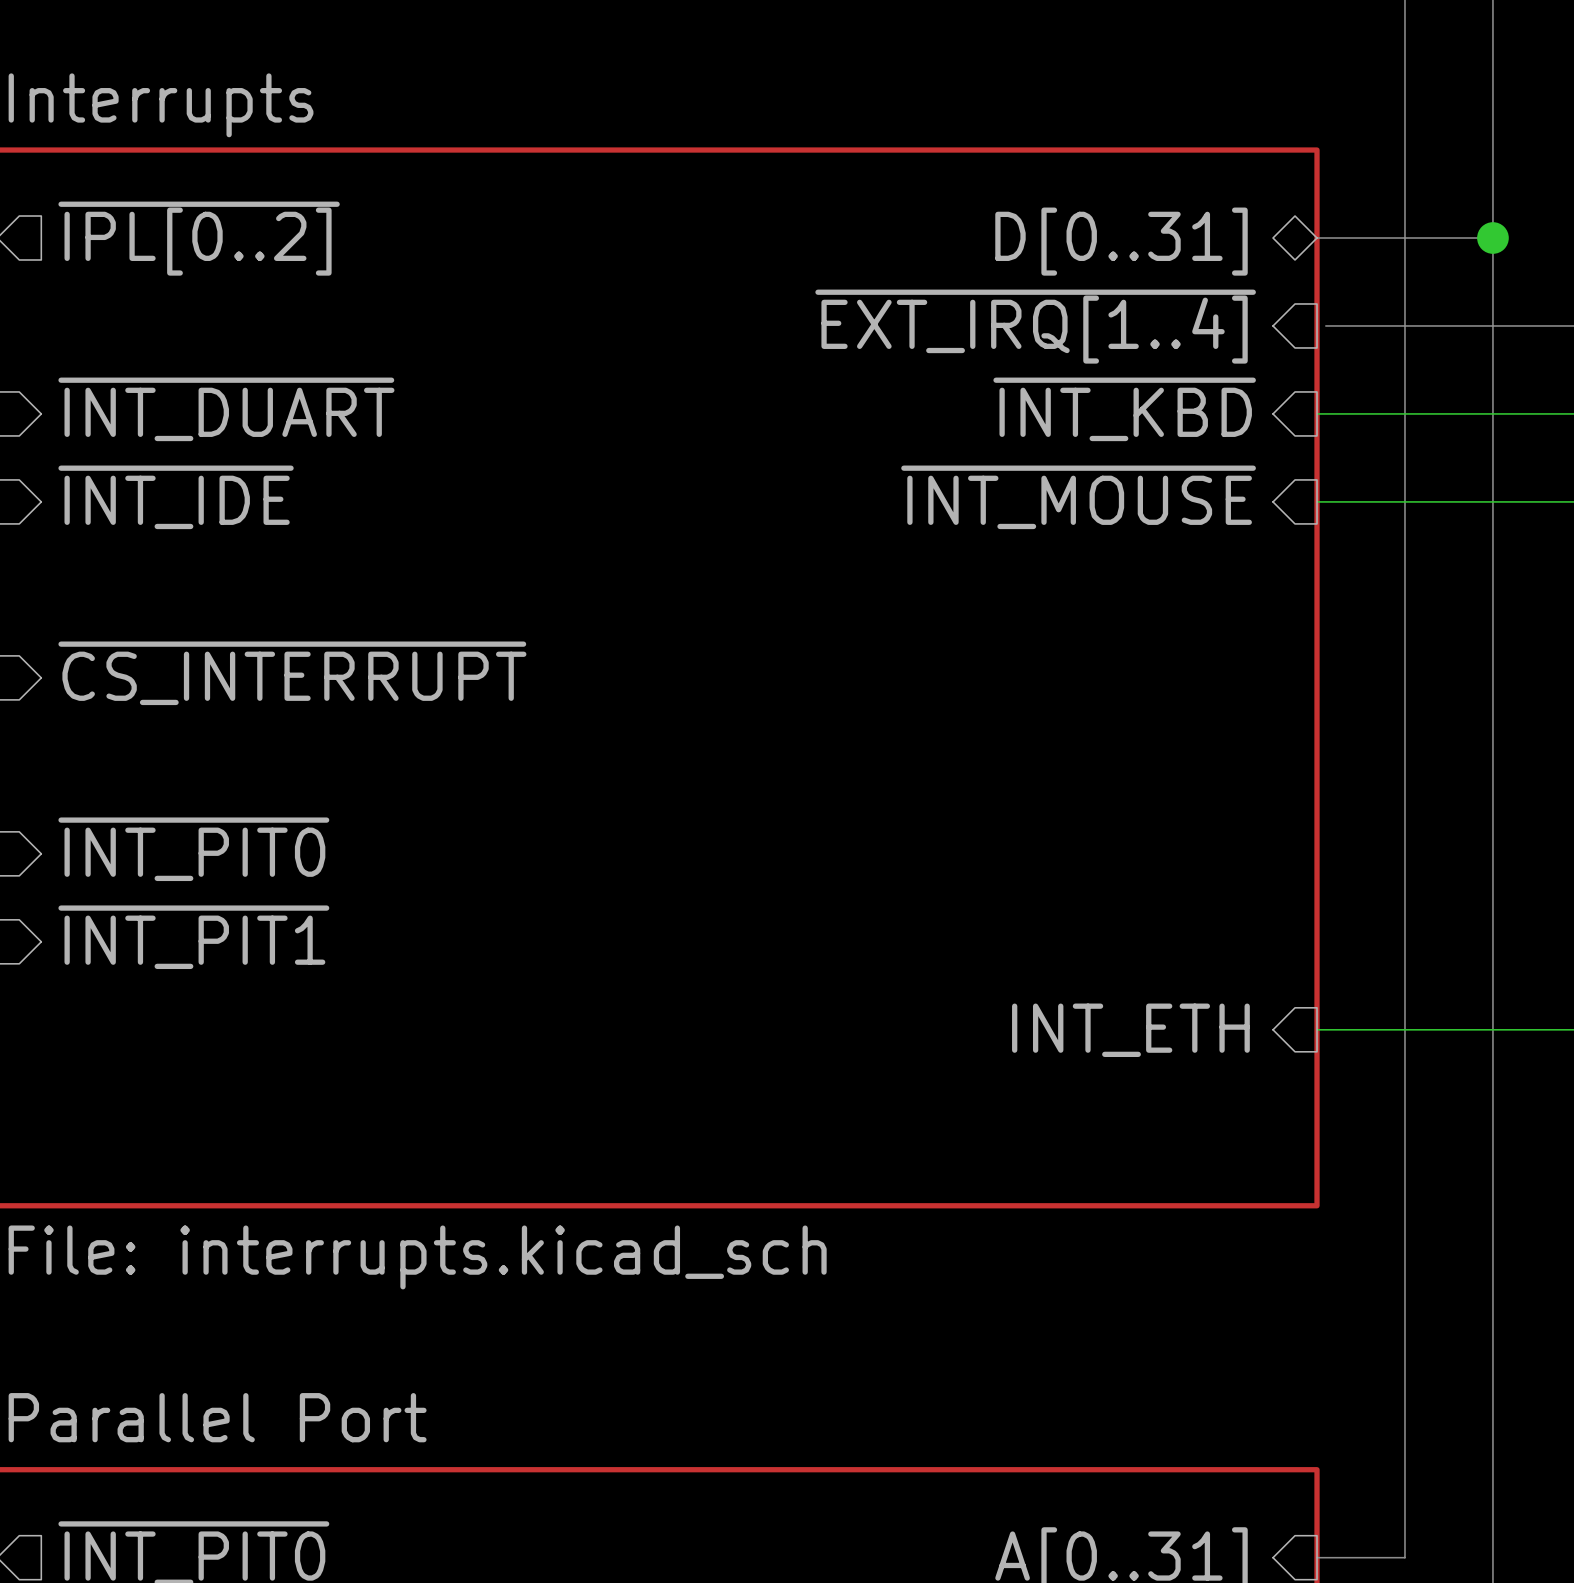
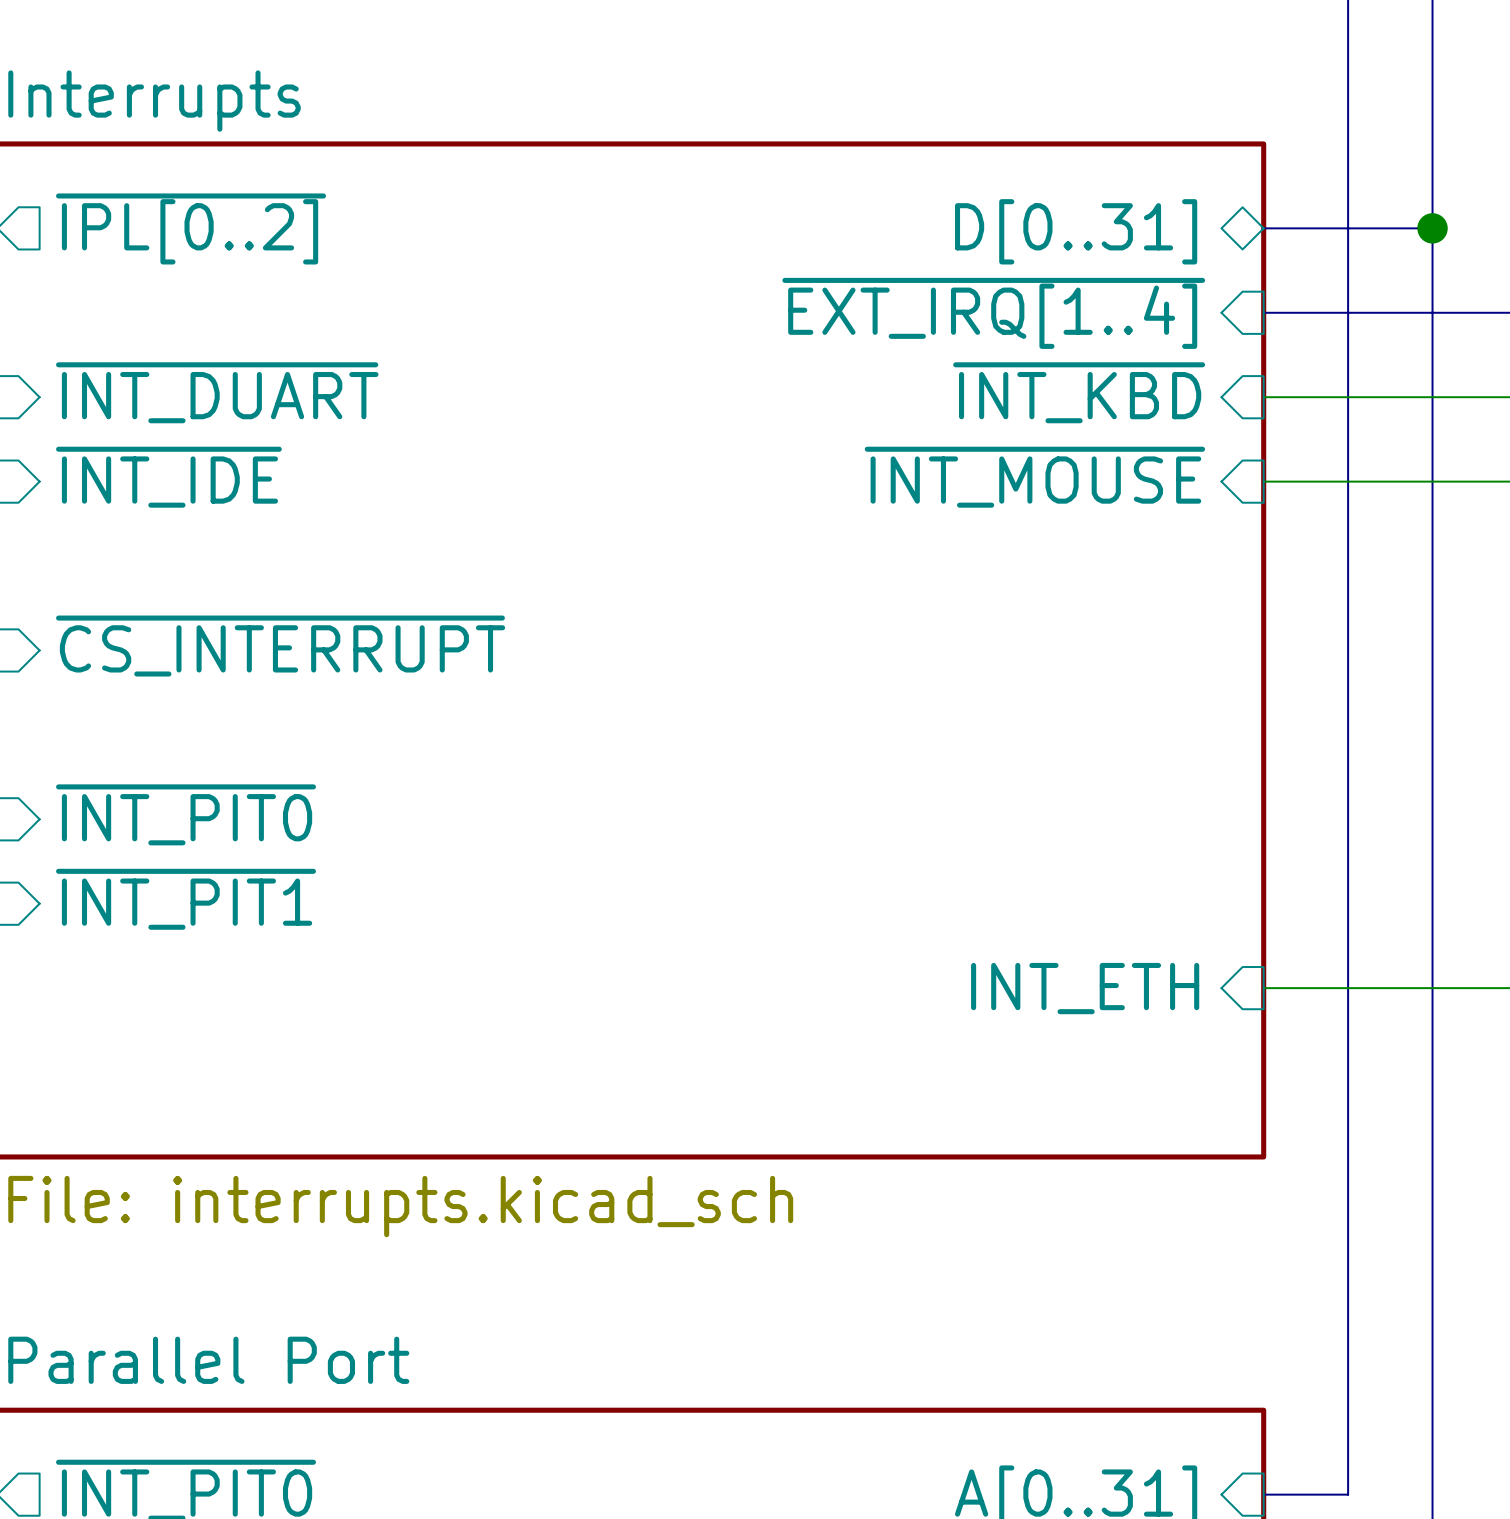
bus: none -> (1263, 312) (1272, 312)

